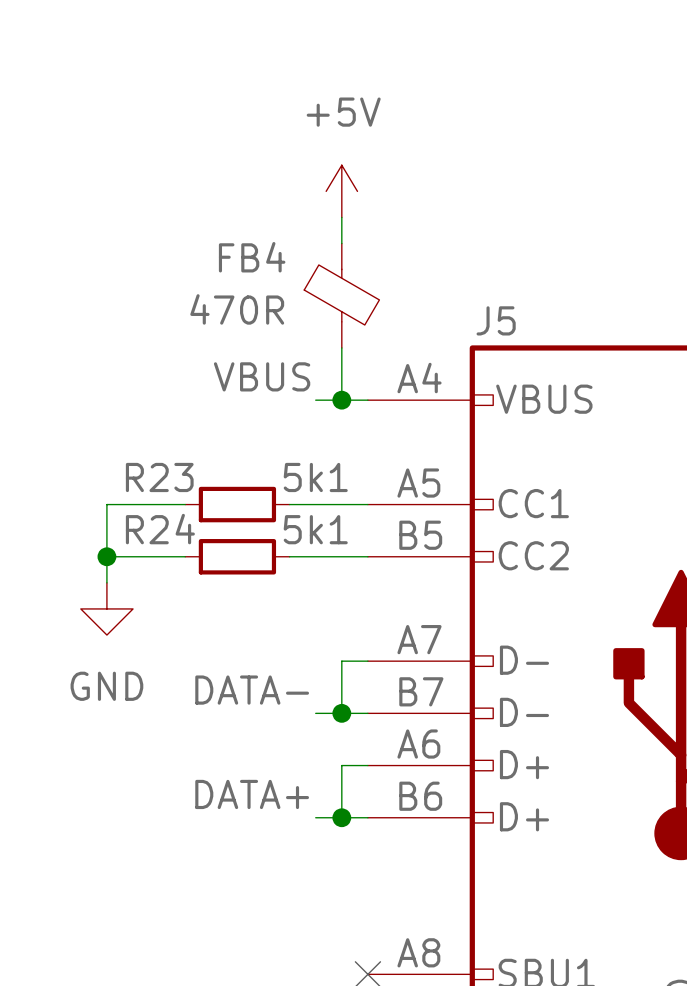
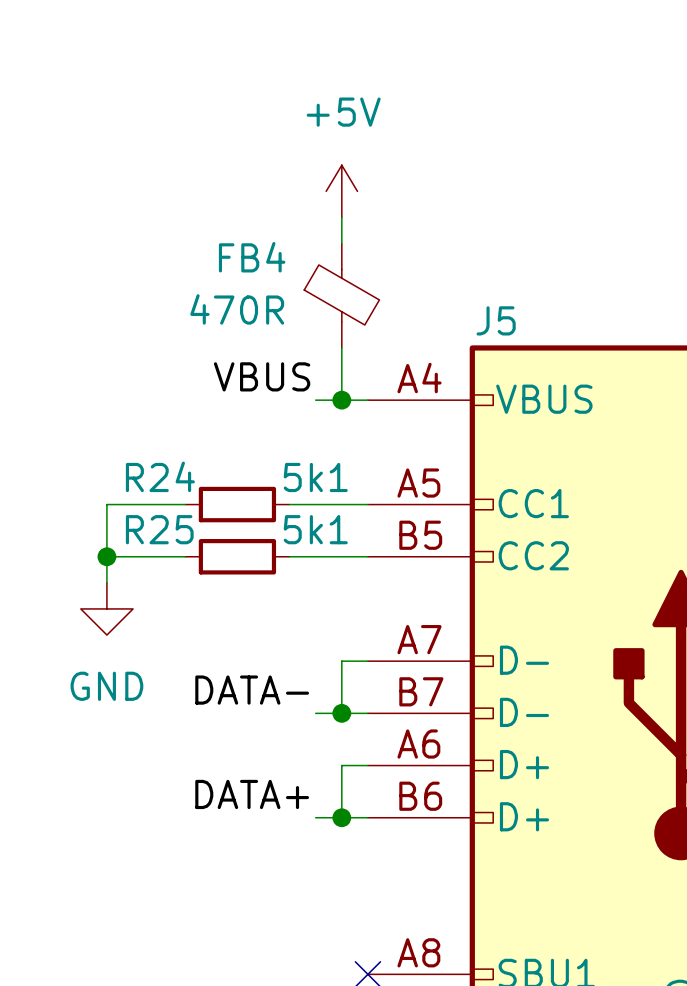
R23 name: R23 (159, 477) -> R24 (160, 476)
R24 name: R24 (160, 529) -> R25 (159, 529)

